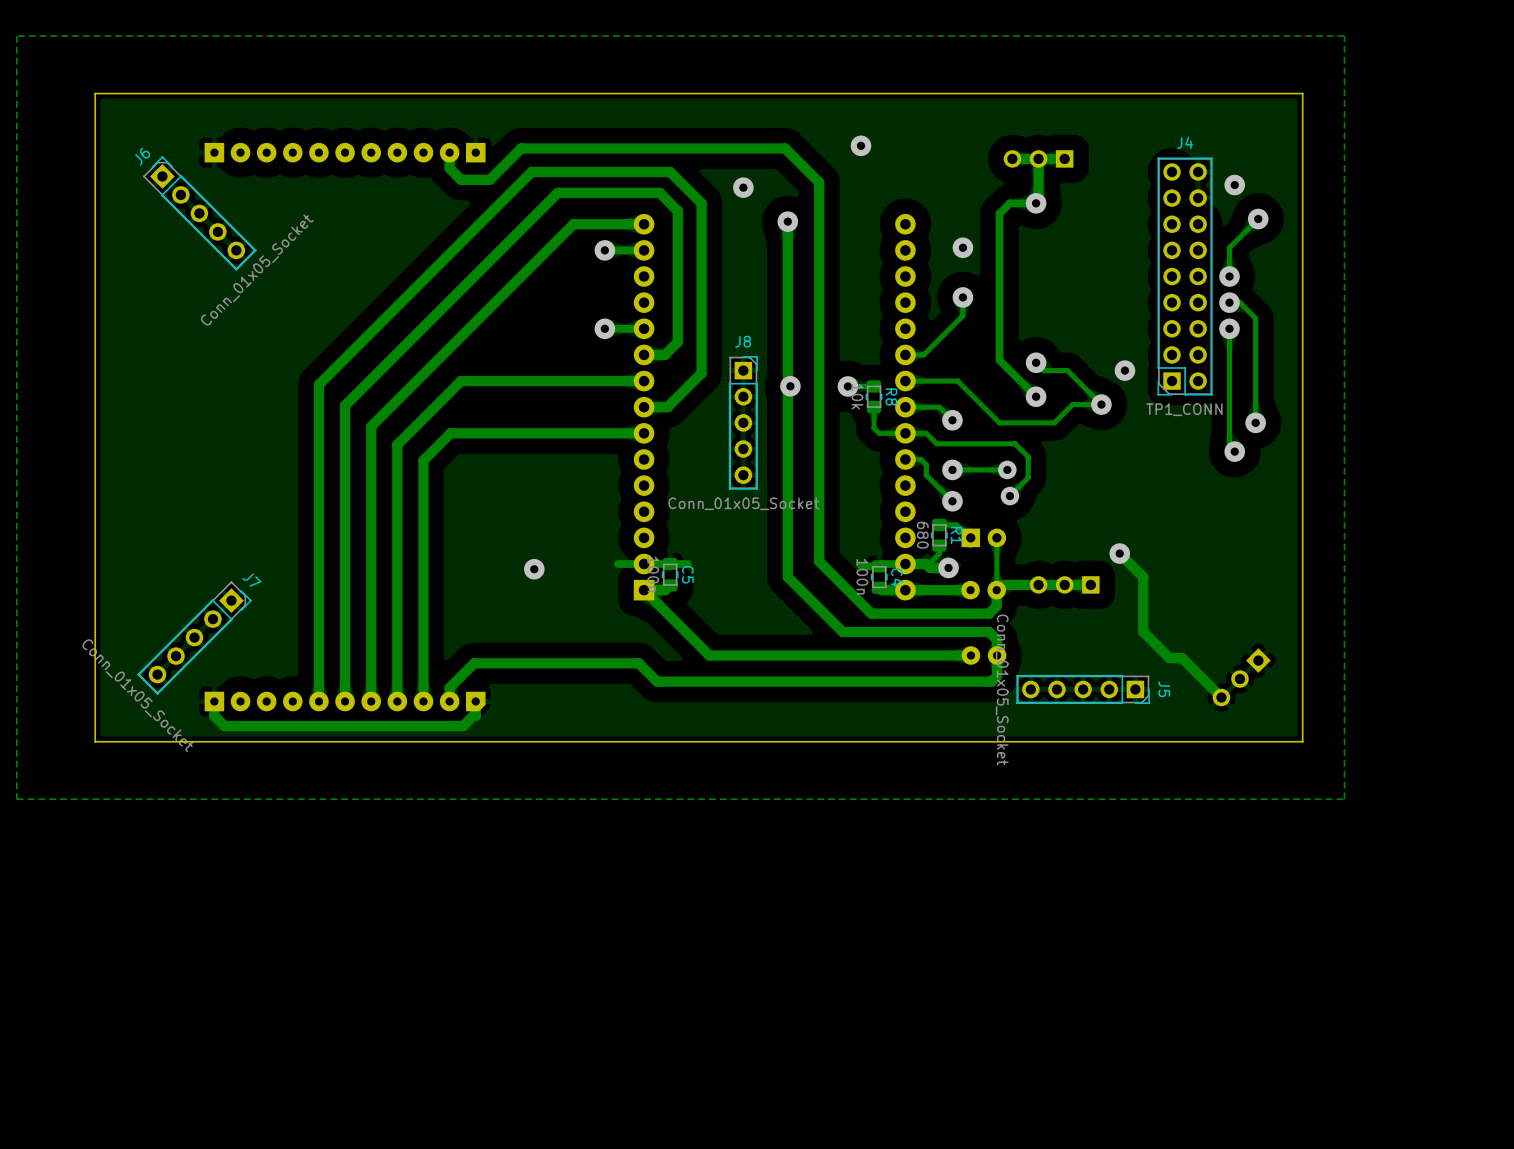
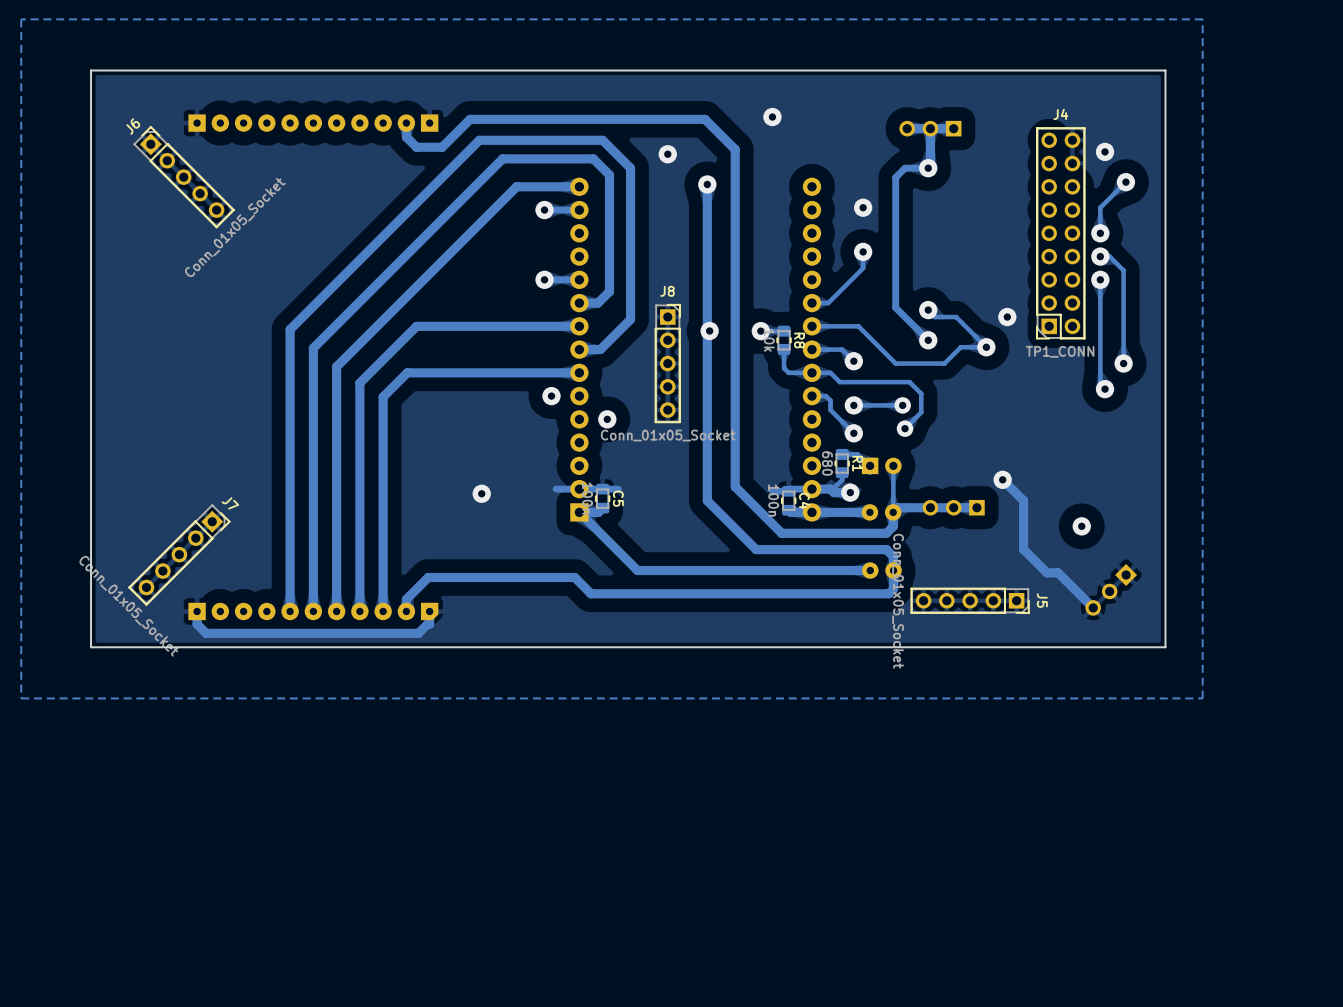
via: none -> (551, 396)
via: none -> (607, 419)
via: none -> (1081, 526)

